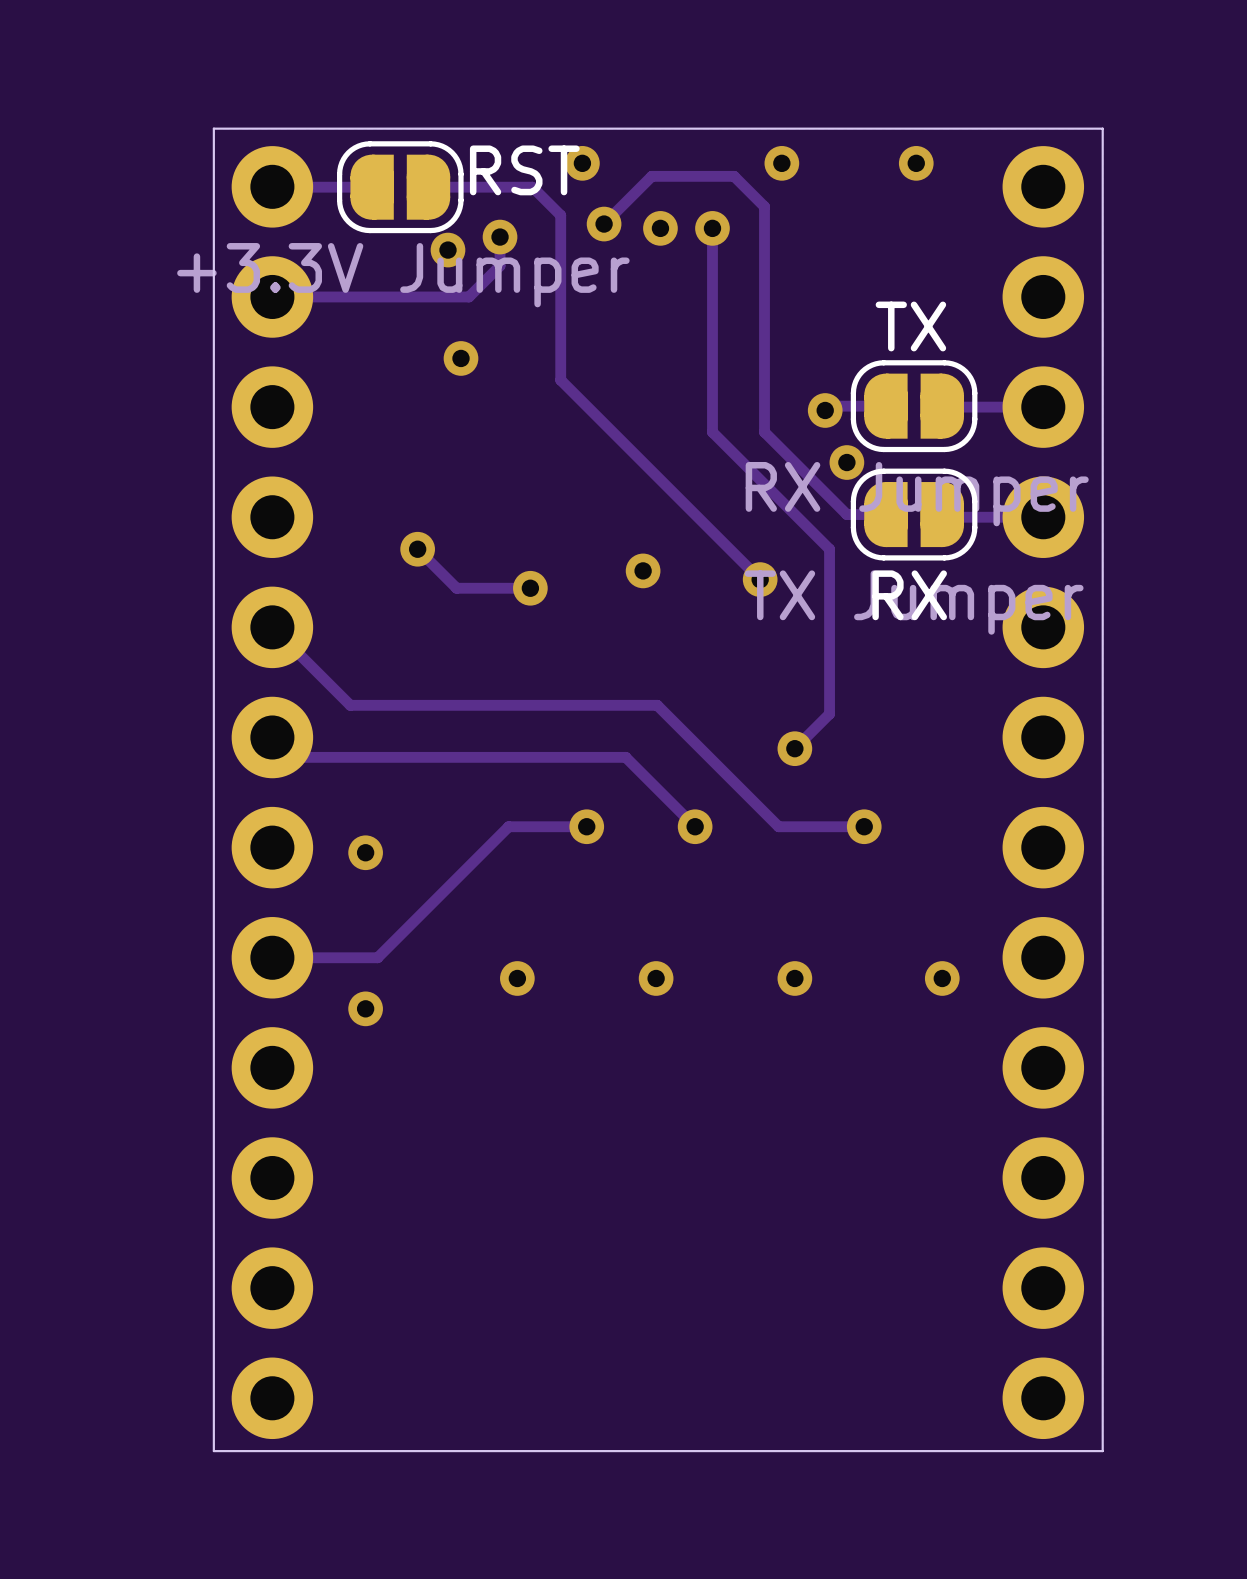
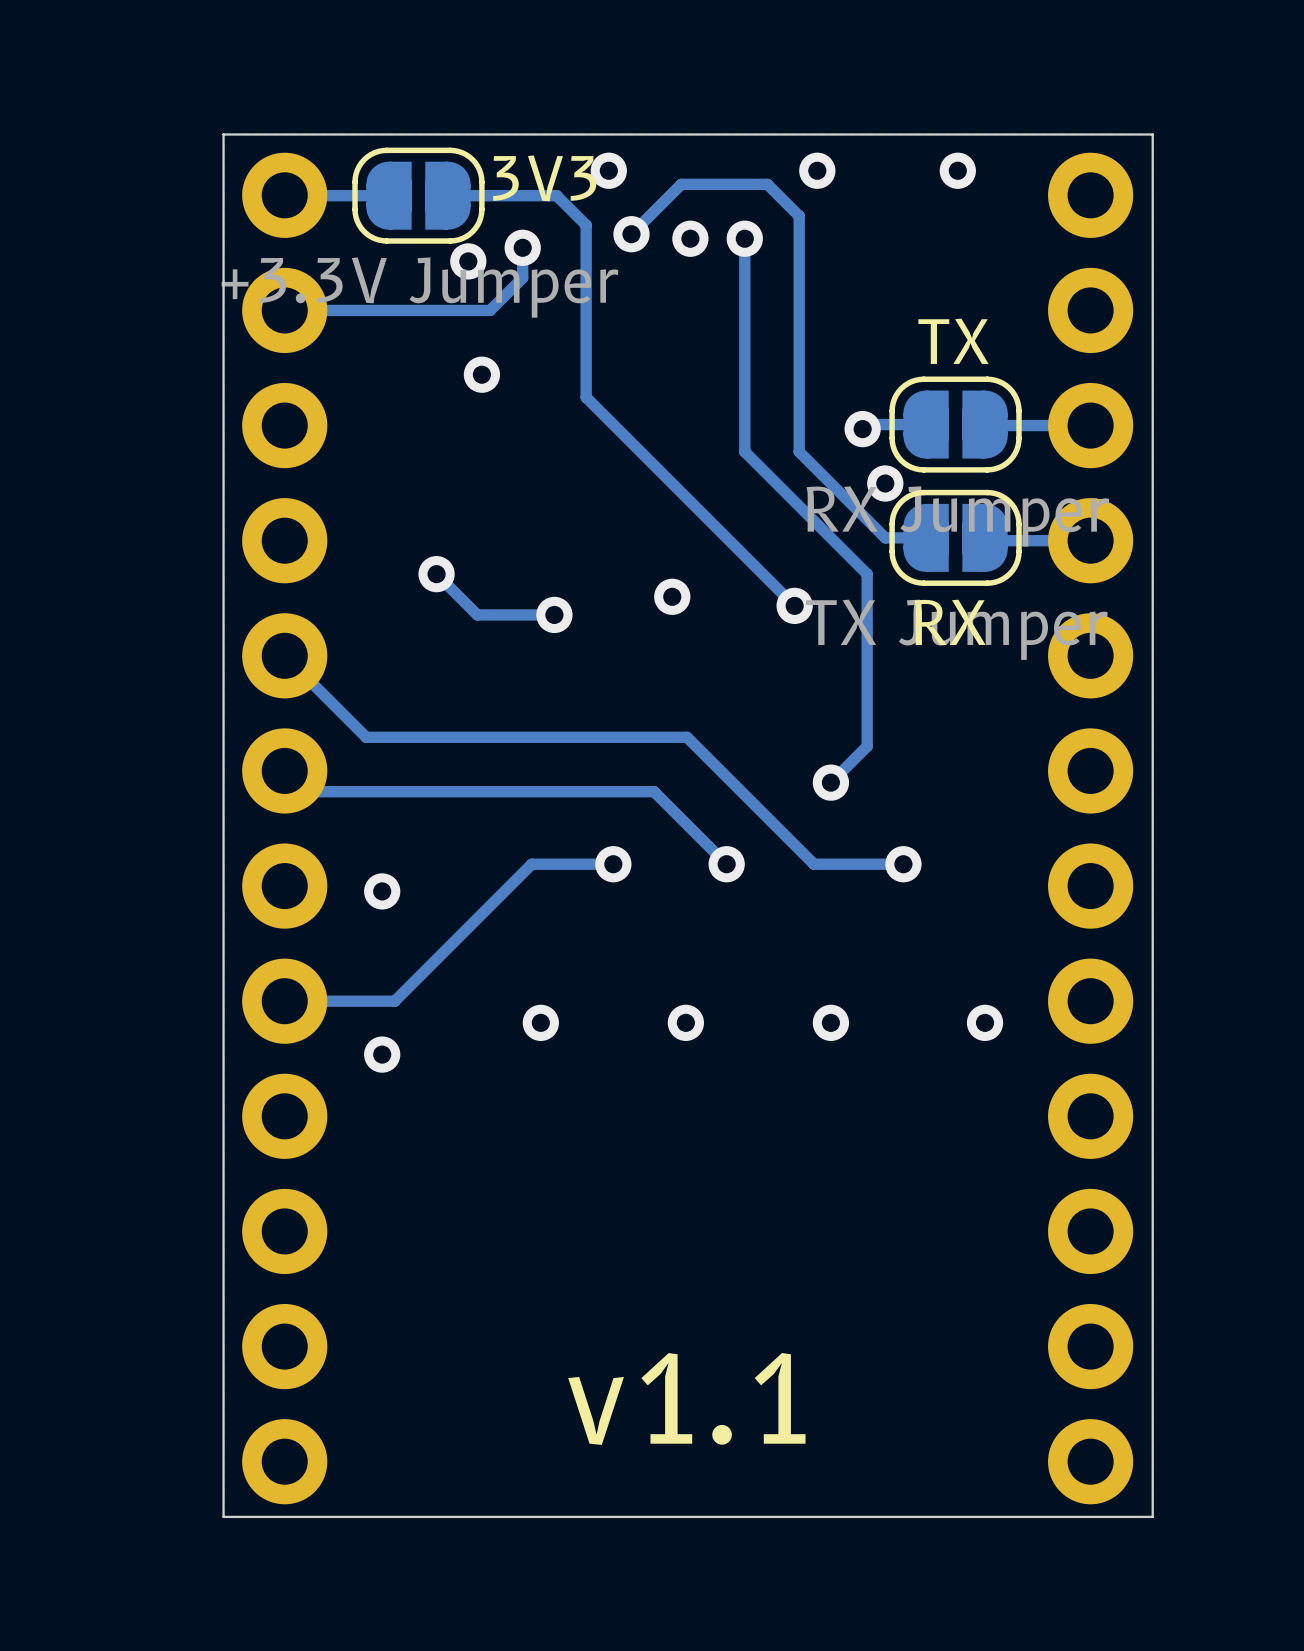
text: RST (524, 170) -> 3V3 (544, 178)
text: none -> v1.1 (686, 1398)

